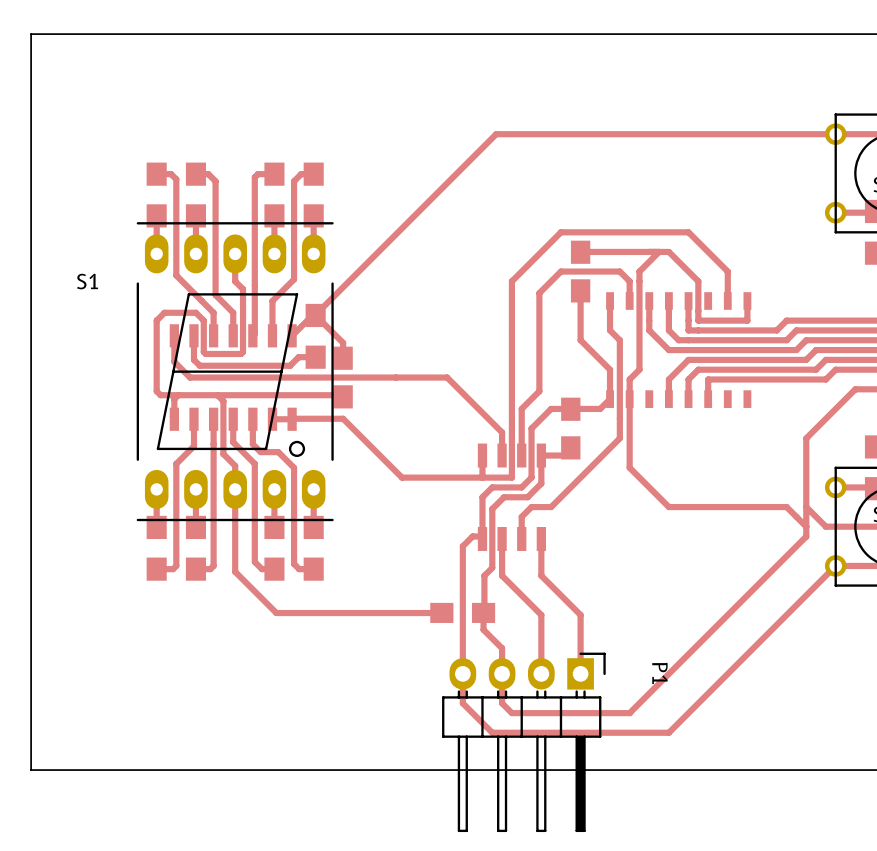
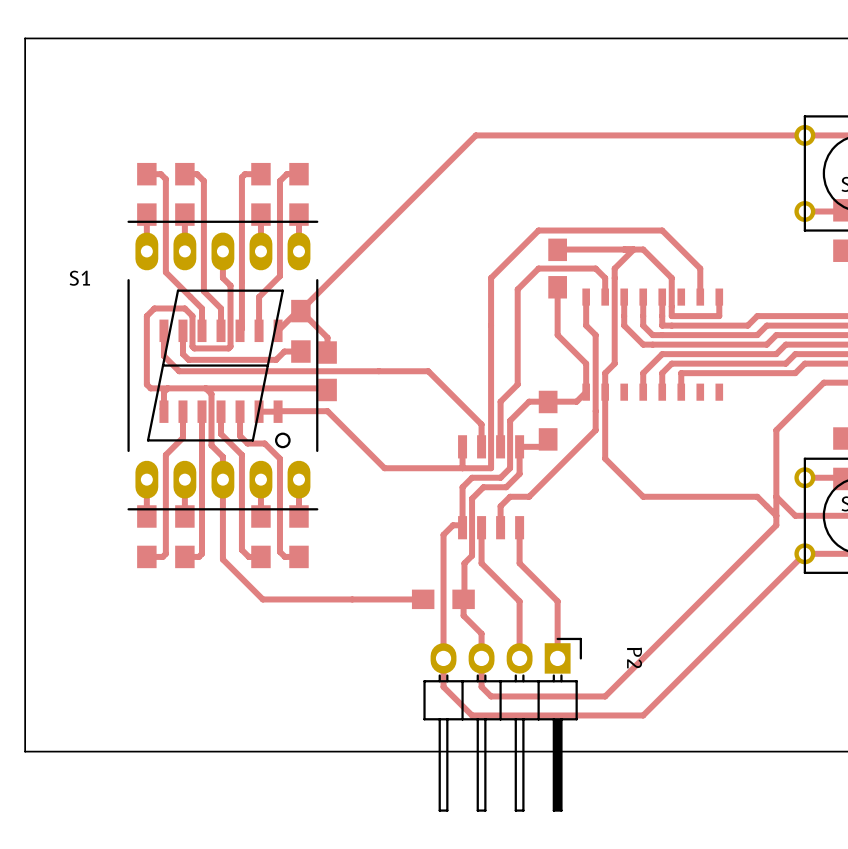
P1 name: P1 (659, 673) -> P2 (634, 657)

